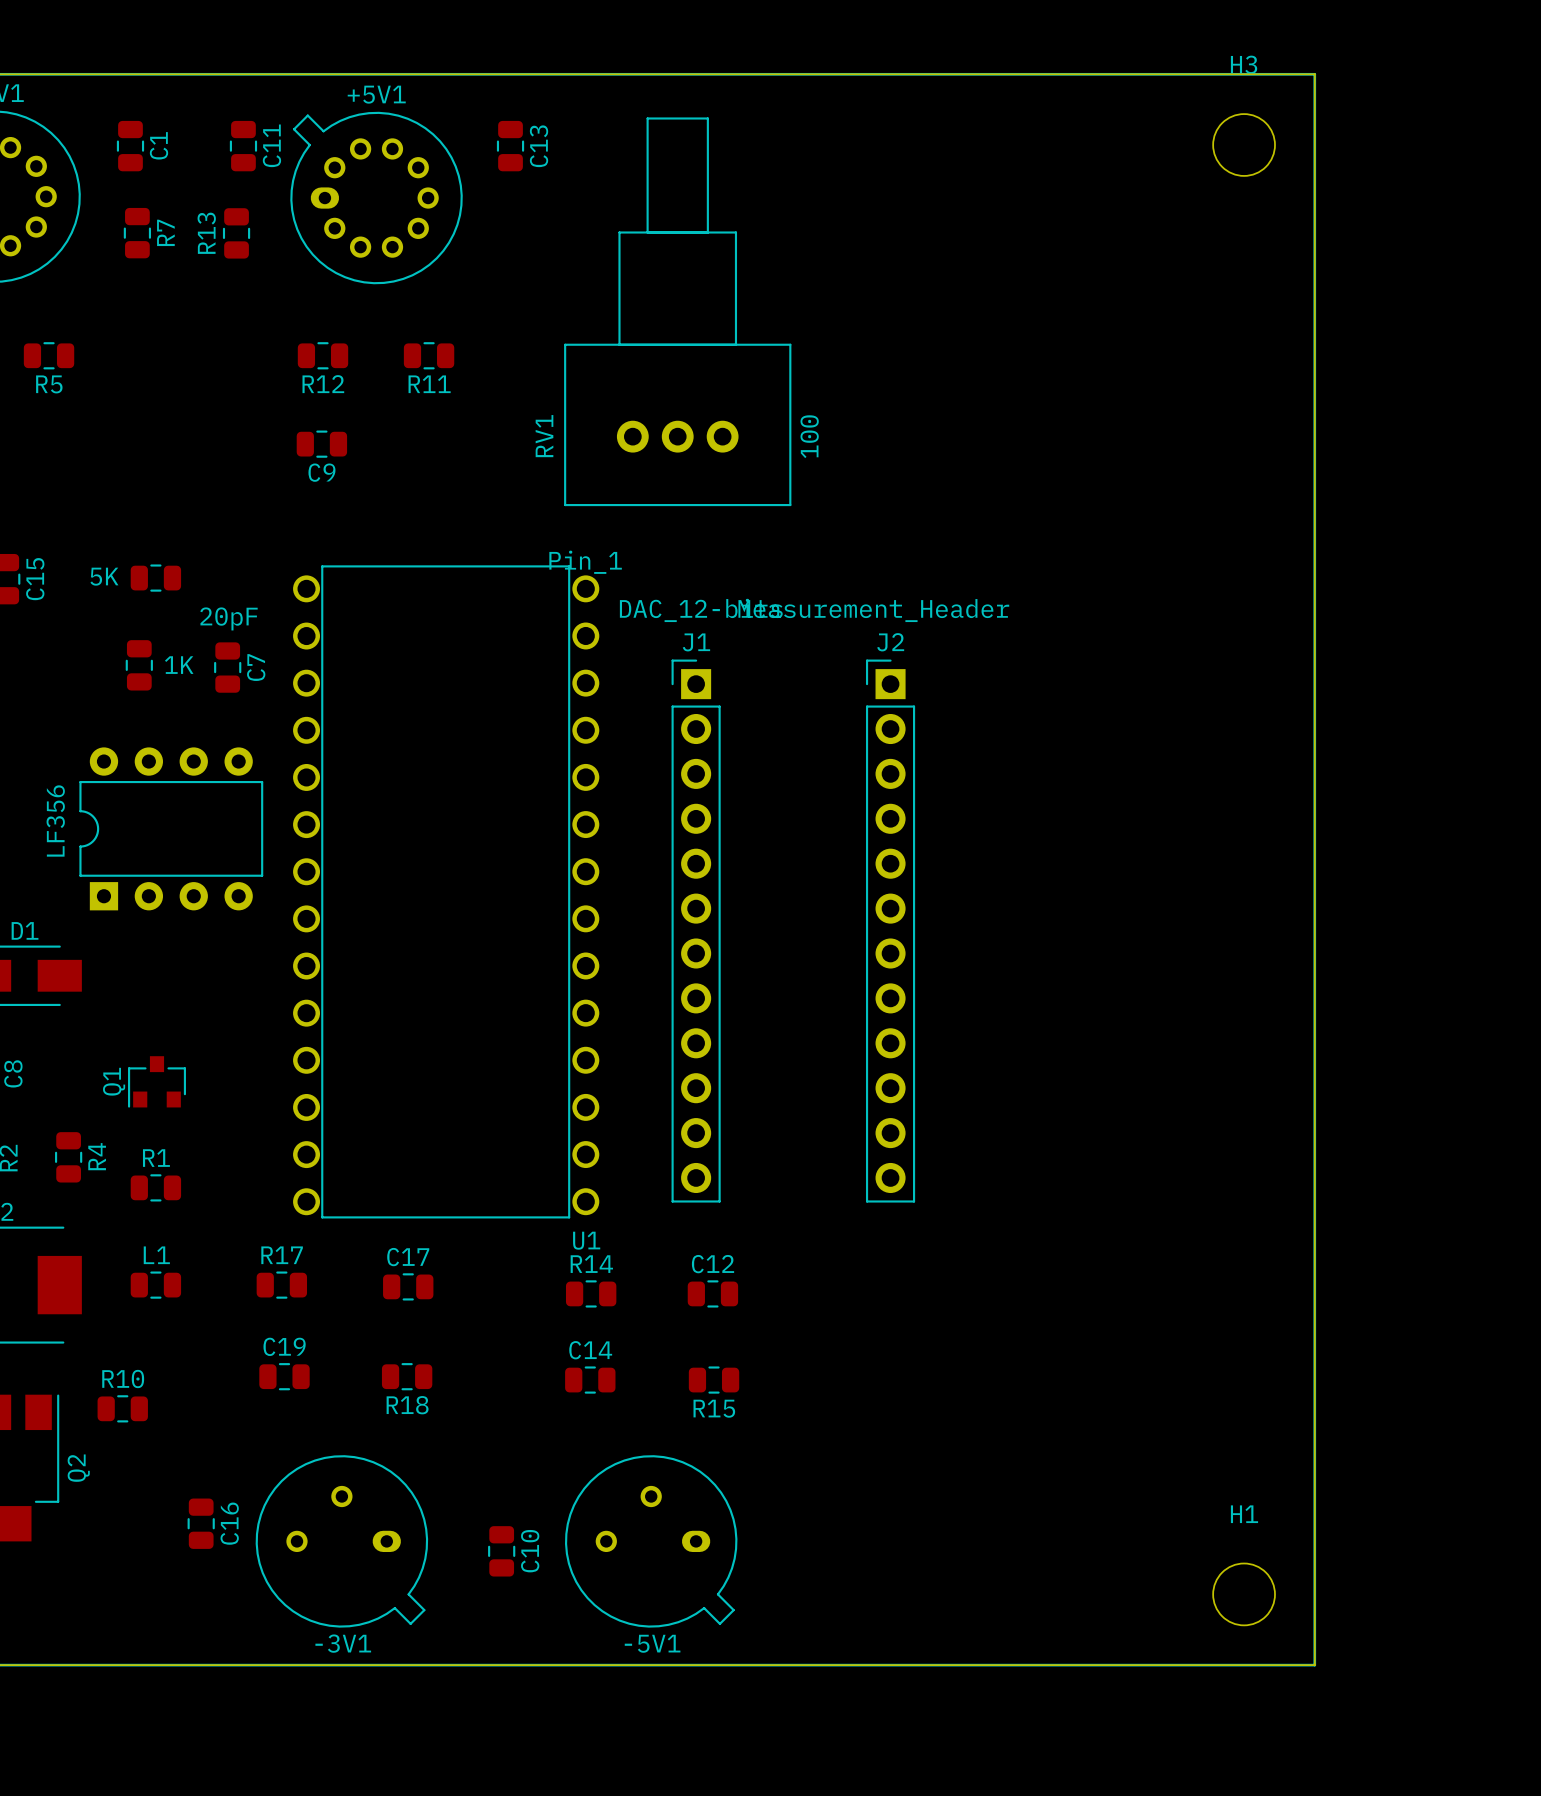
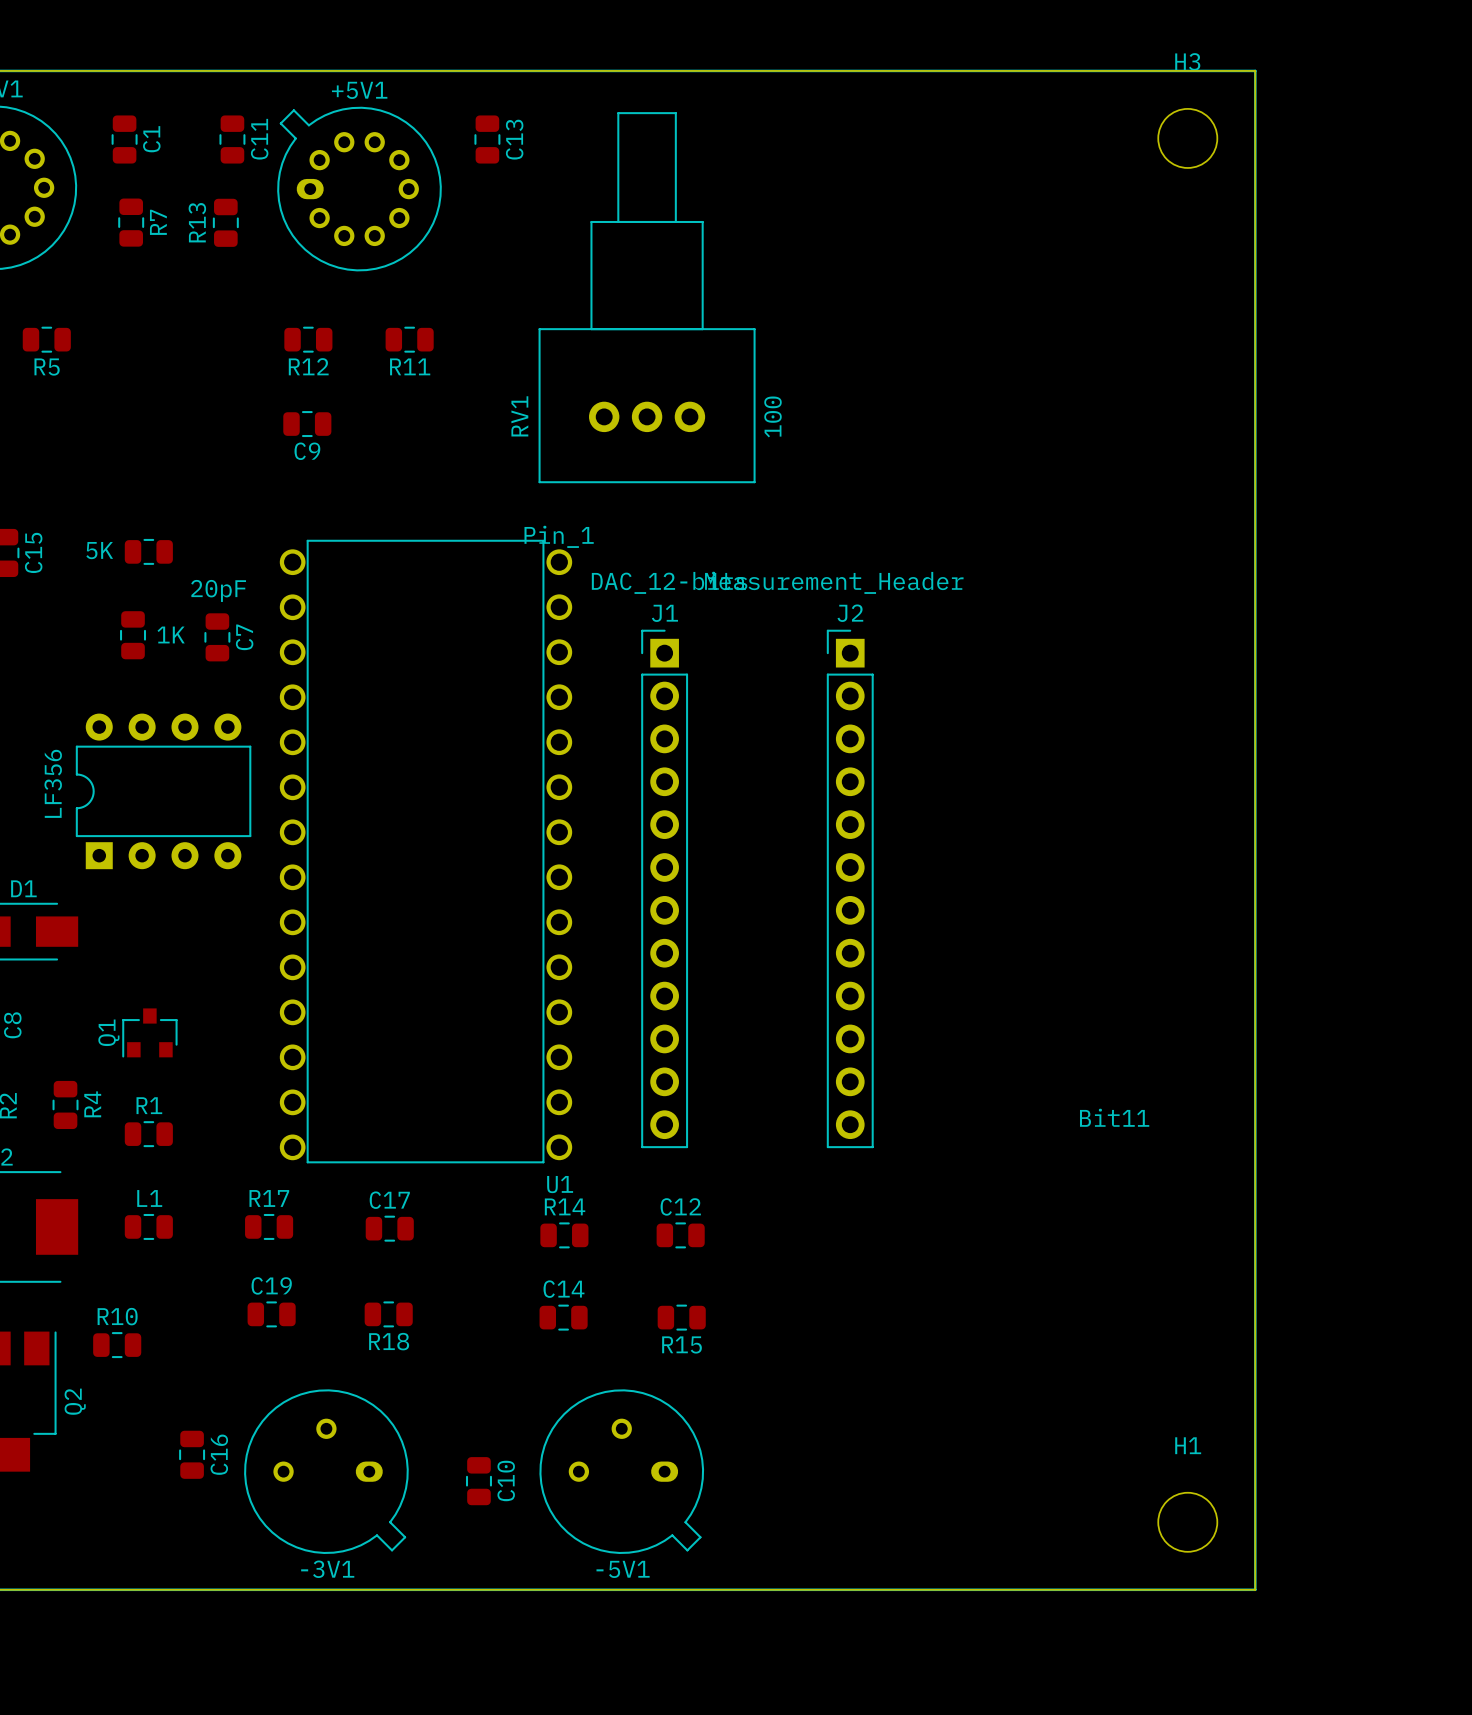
text: none -> Bit11 (1114, 1117)

